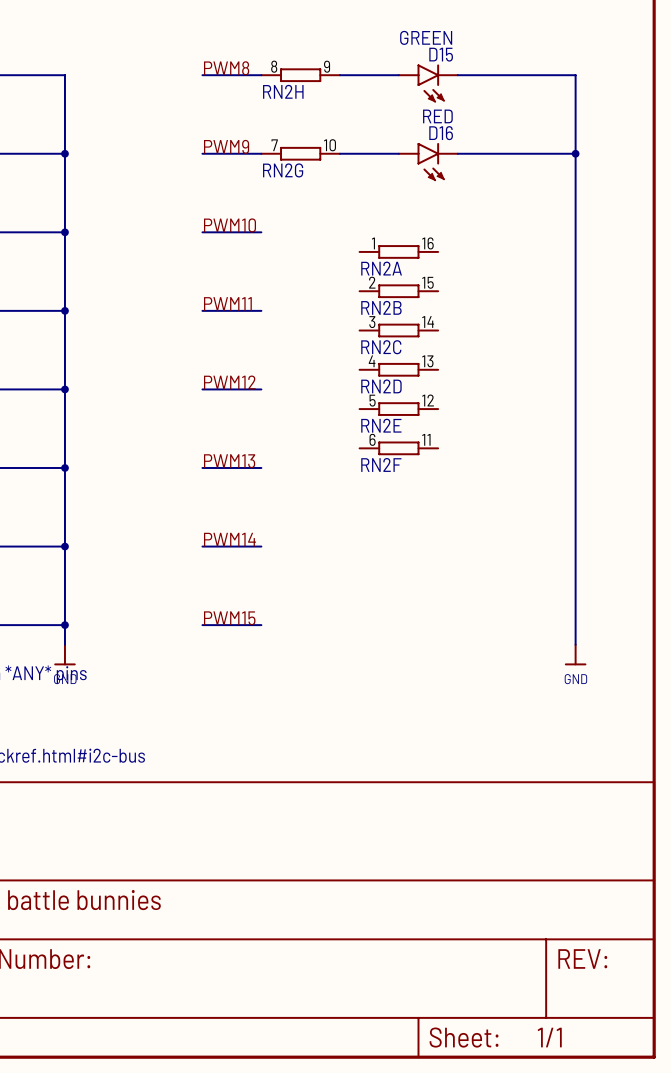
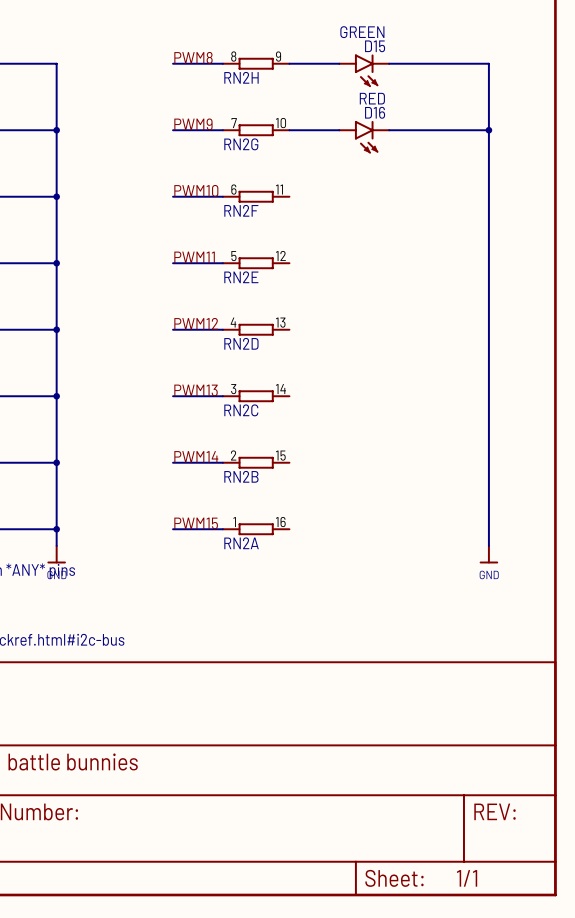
RN2A position: (398, 251) -> (256, 529)
RN2B position: (398, 291) -> (256, 462)
RN2C position: (398, 330) -> (256, 396)
RN2D position: (398, 369) -> (256, 329)
RN2E position: (398, 409) -> (256, 263)
RN2F position: (398, 448) -> (256, 196)

